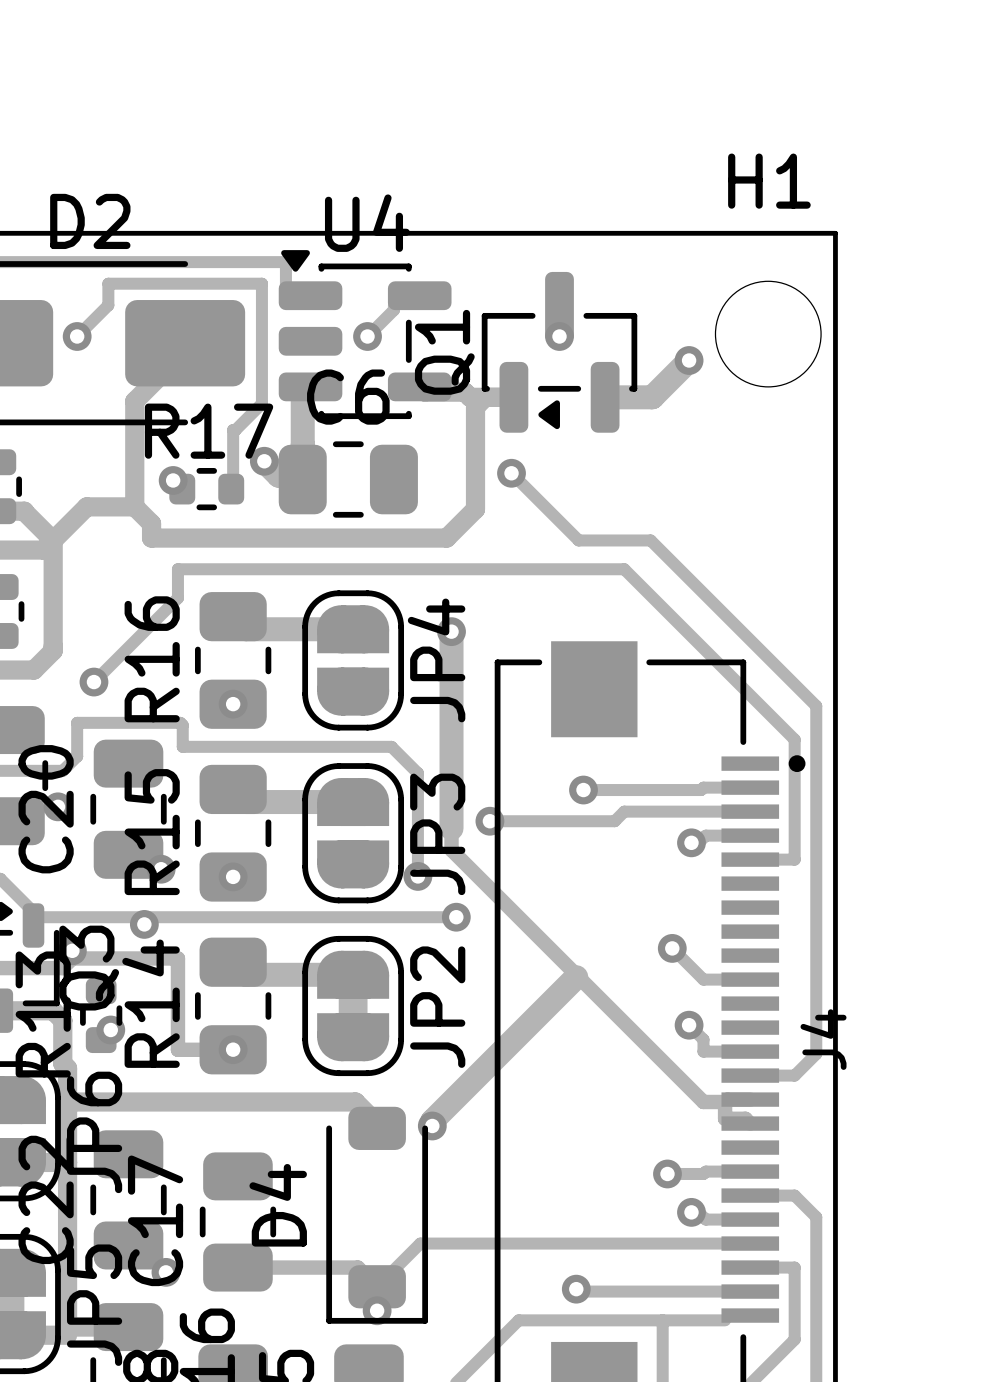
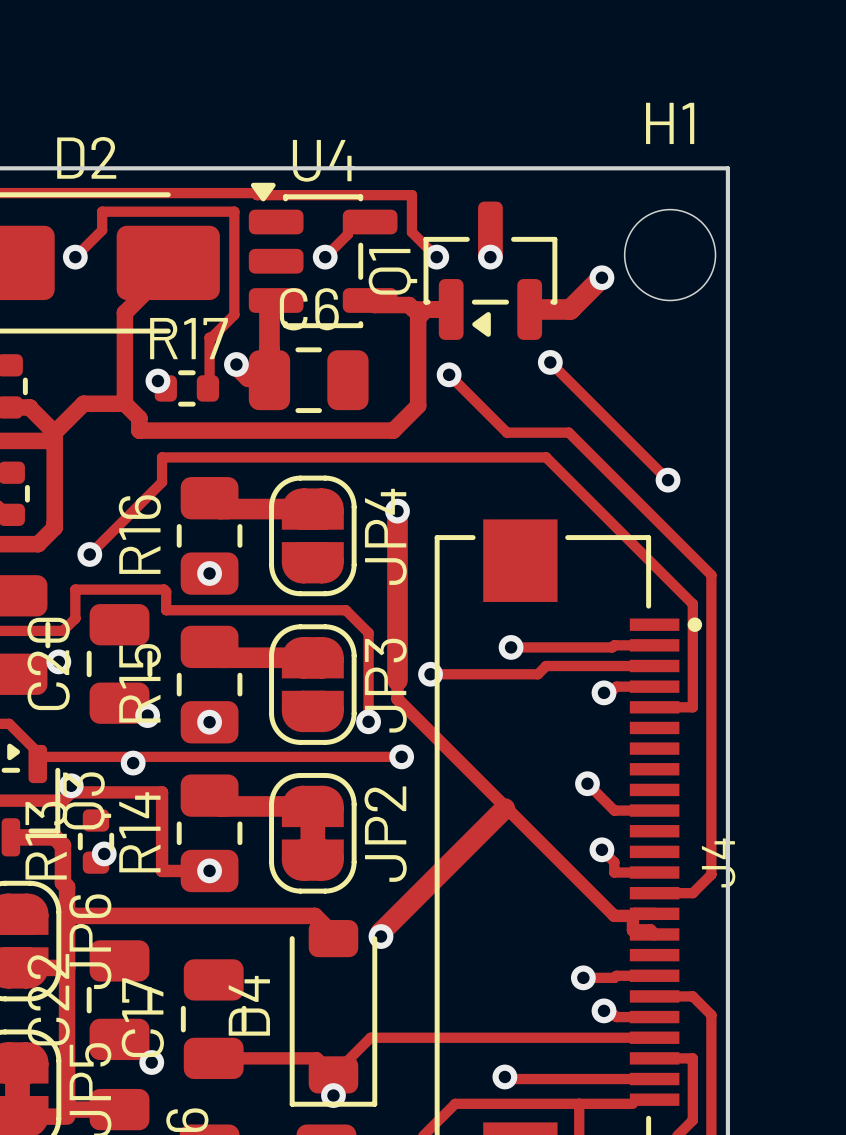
track: (285, 262) (285, 286) -> (255, 193) (257, 195) (411, 195) (411, 232) (436, 257)
via: none -> (436, 257)
track: none -> (550, 362) (668, 480)
via: none -> (550, 362)
via: none -> (668, 480)

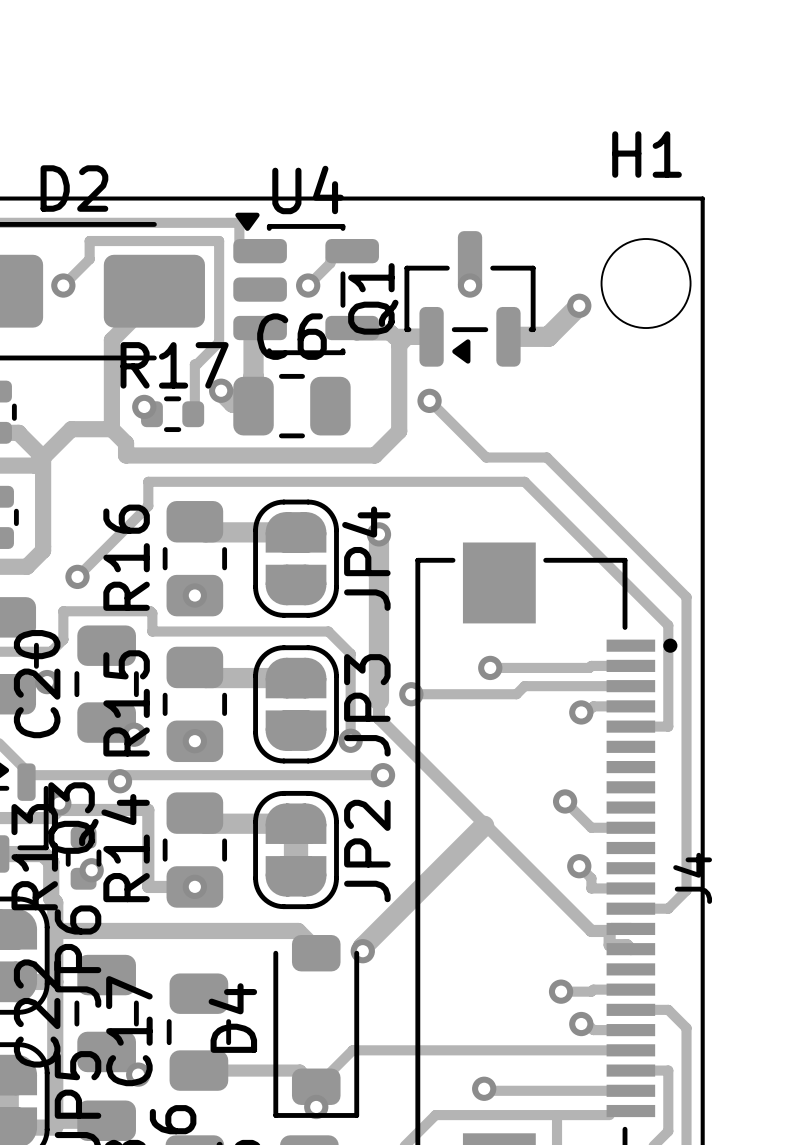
track: (255, 193) (257, 195) (411, 195) (411, 232) (436, 257) -> (239, 222) (239, 243)
via: (436, 257) -> none
track: (550, 362) (668, 480) -> none
via: (550, 362) -> none
via: (668, 480) -> none

